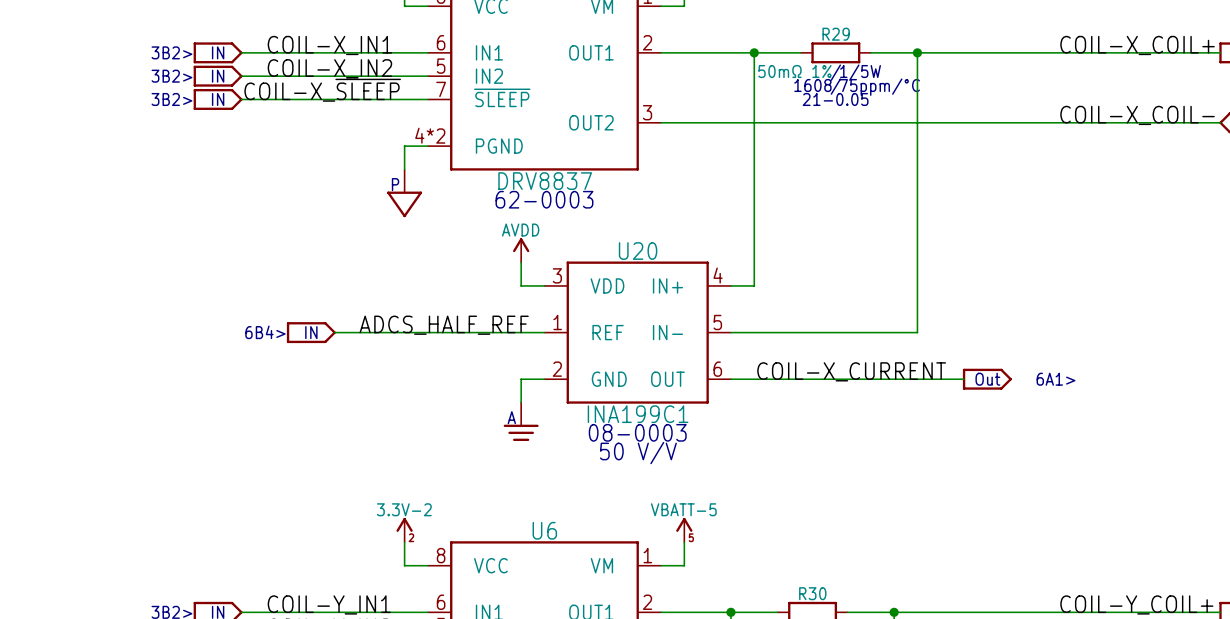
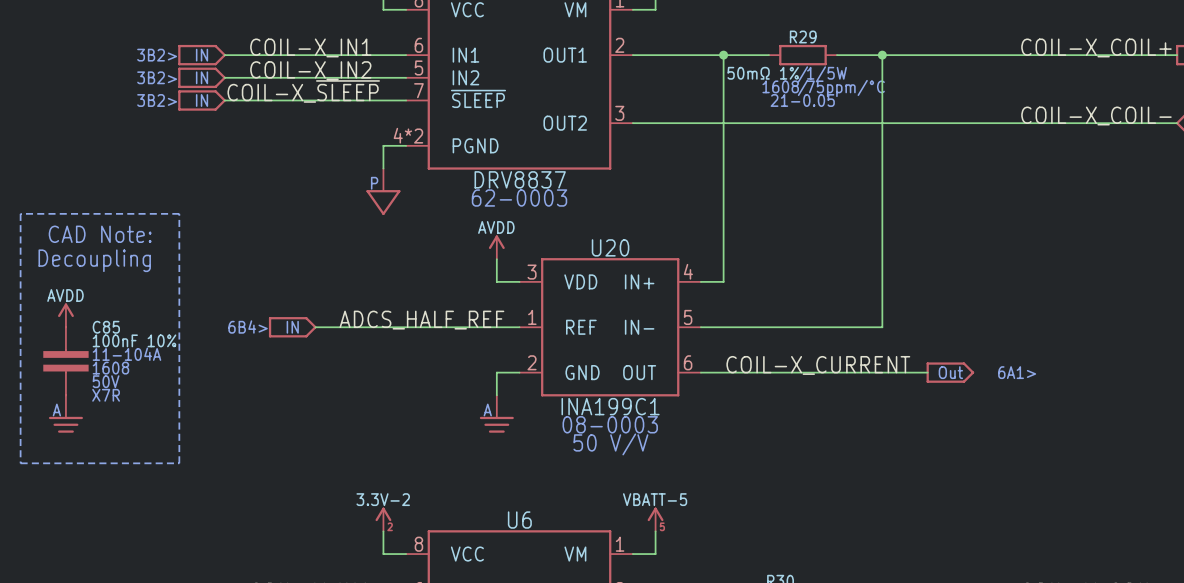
line: none -> (20, 213) (20, 463) (179, 463) (179, 213) (20, 213)
text: none -> CAD Note: (100, 234)
text: none -> Decoupling (94, 260)
power symbol: none -> AVDD (65, 315)
C85: none -> 100nF 10% (65, 361)
power symbol: none -> (65, 414)

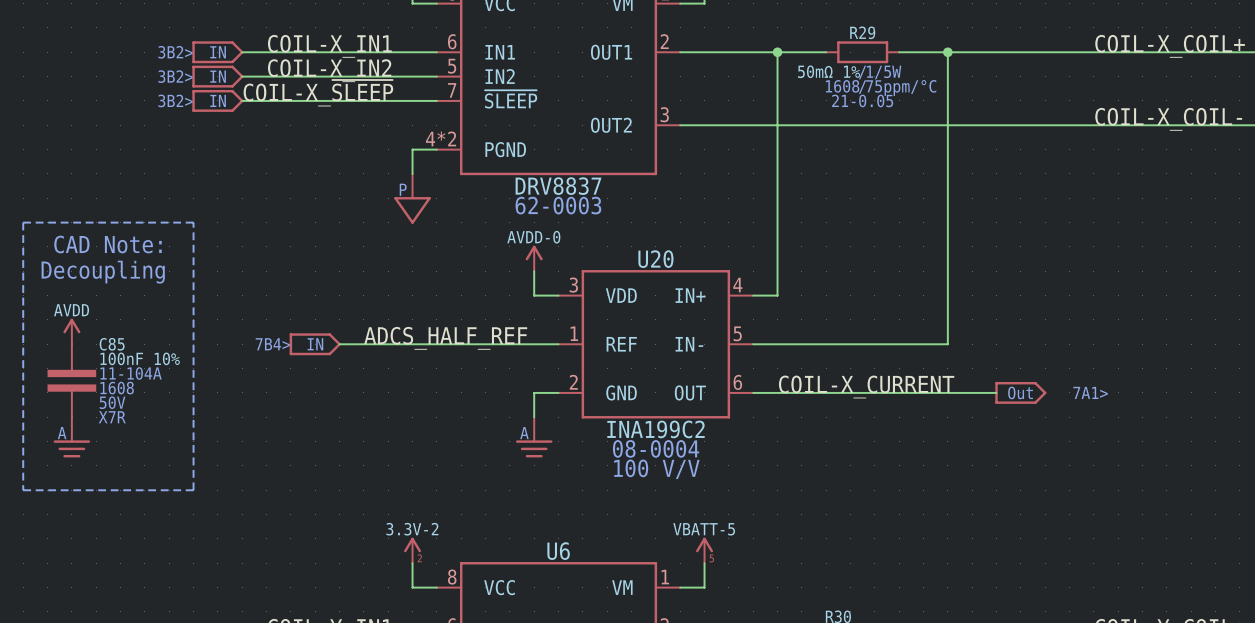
power symbol: AVDD (496, 247) -> AVDD-0 (534, 258)
text: 6B4> (248, 326) -> 7B4> (272, 344)
text: 6A1> (1017, 372) -> 7A1> (1090, 392)
U20 value: INA199C1 (610, 406) -> INA199C2 (656, 429)
U20 text: 08-0003 (610, 424) -> 08-0004 (656, 448)
U20 text: 50 V/V (610, 444) -> 100 V/V (656, 469)

